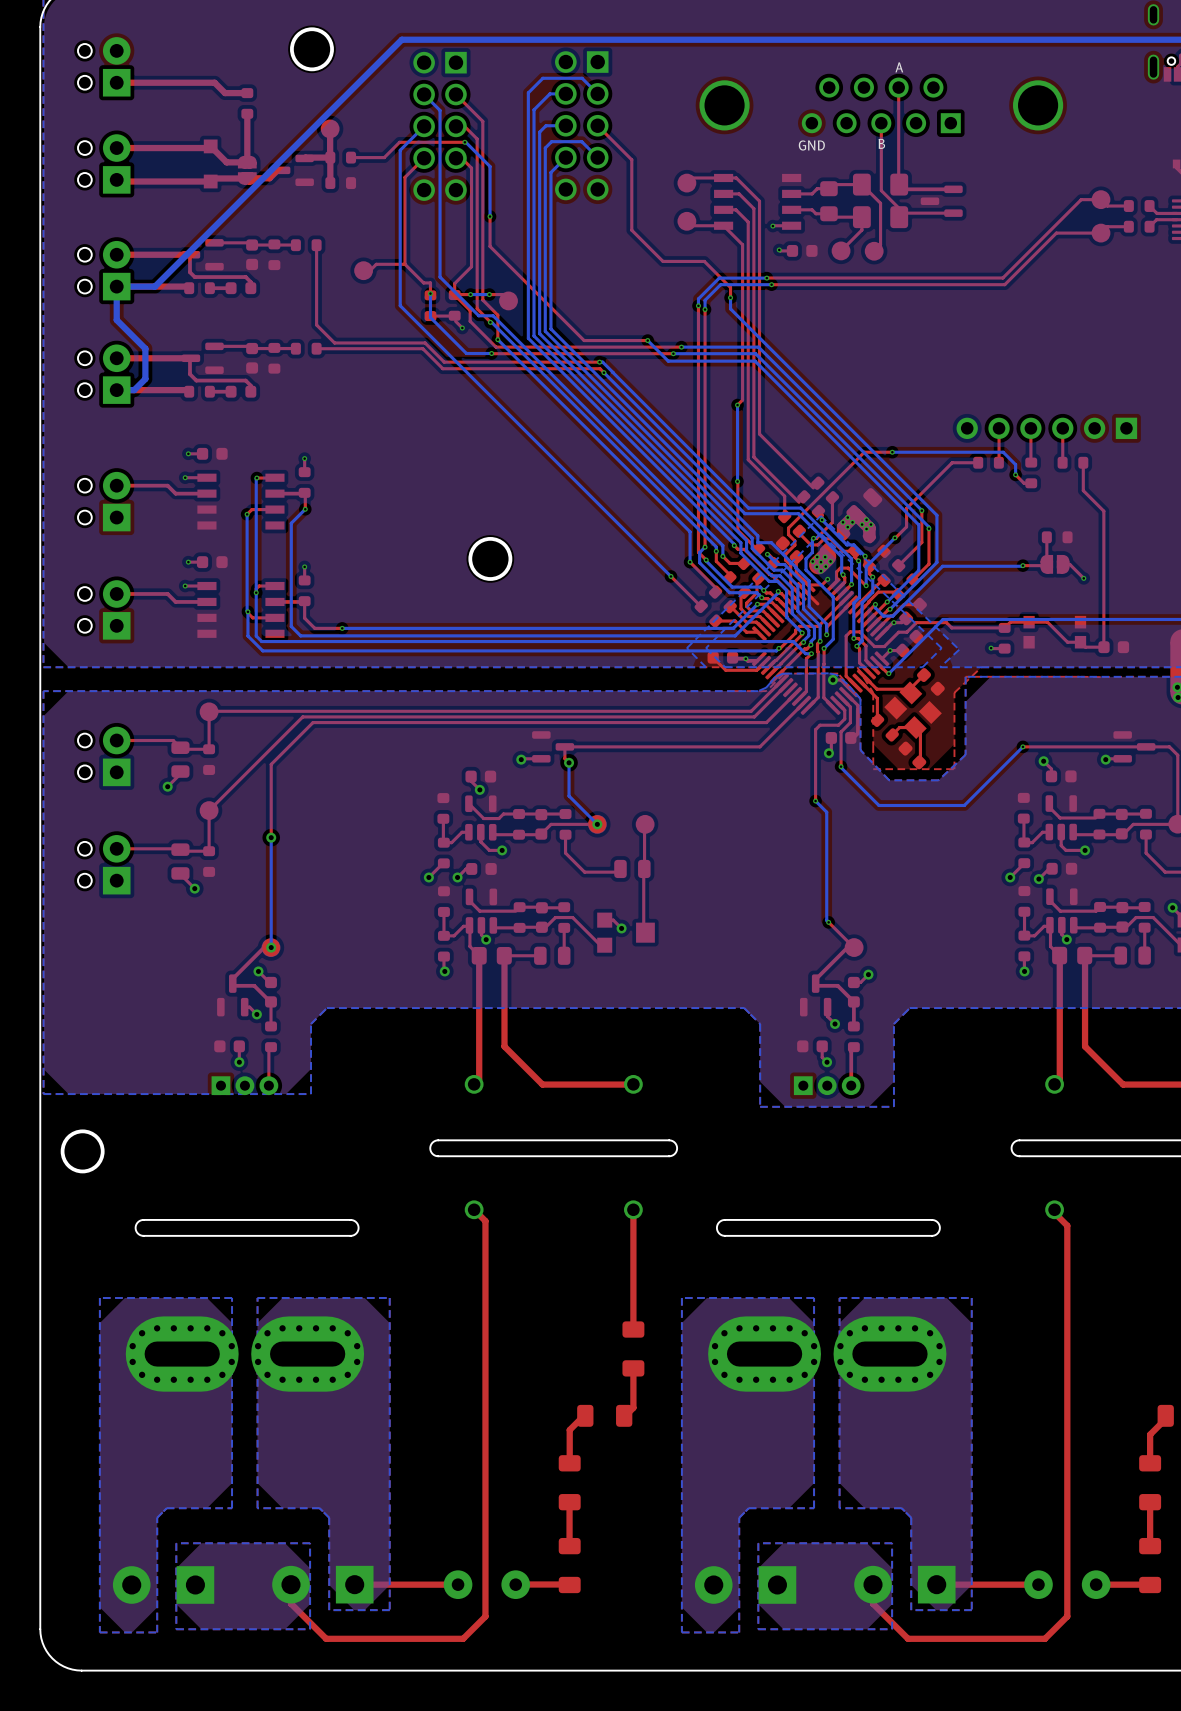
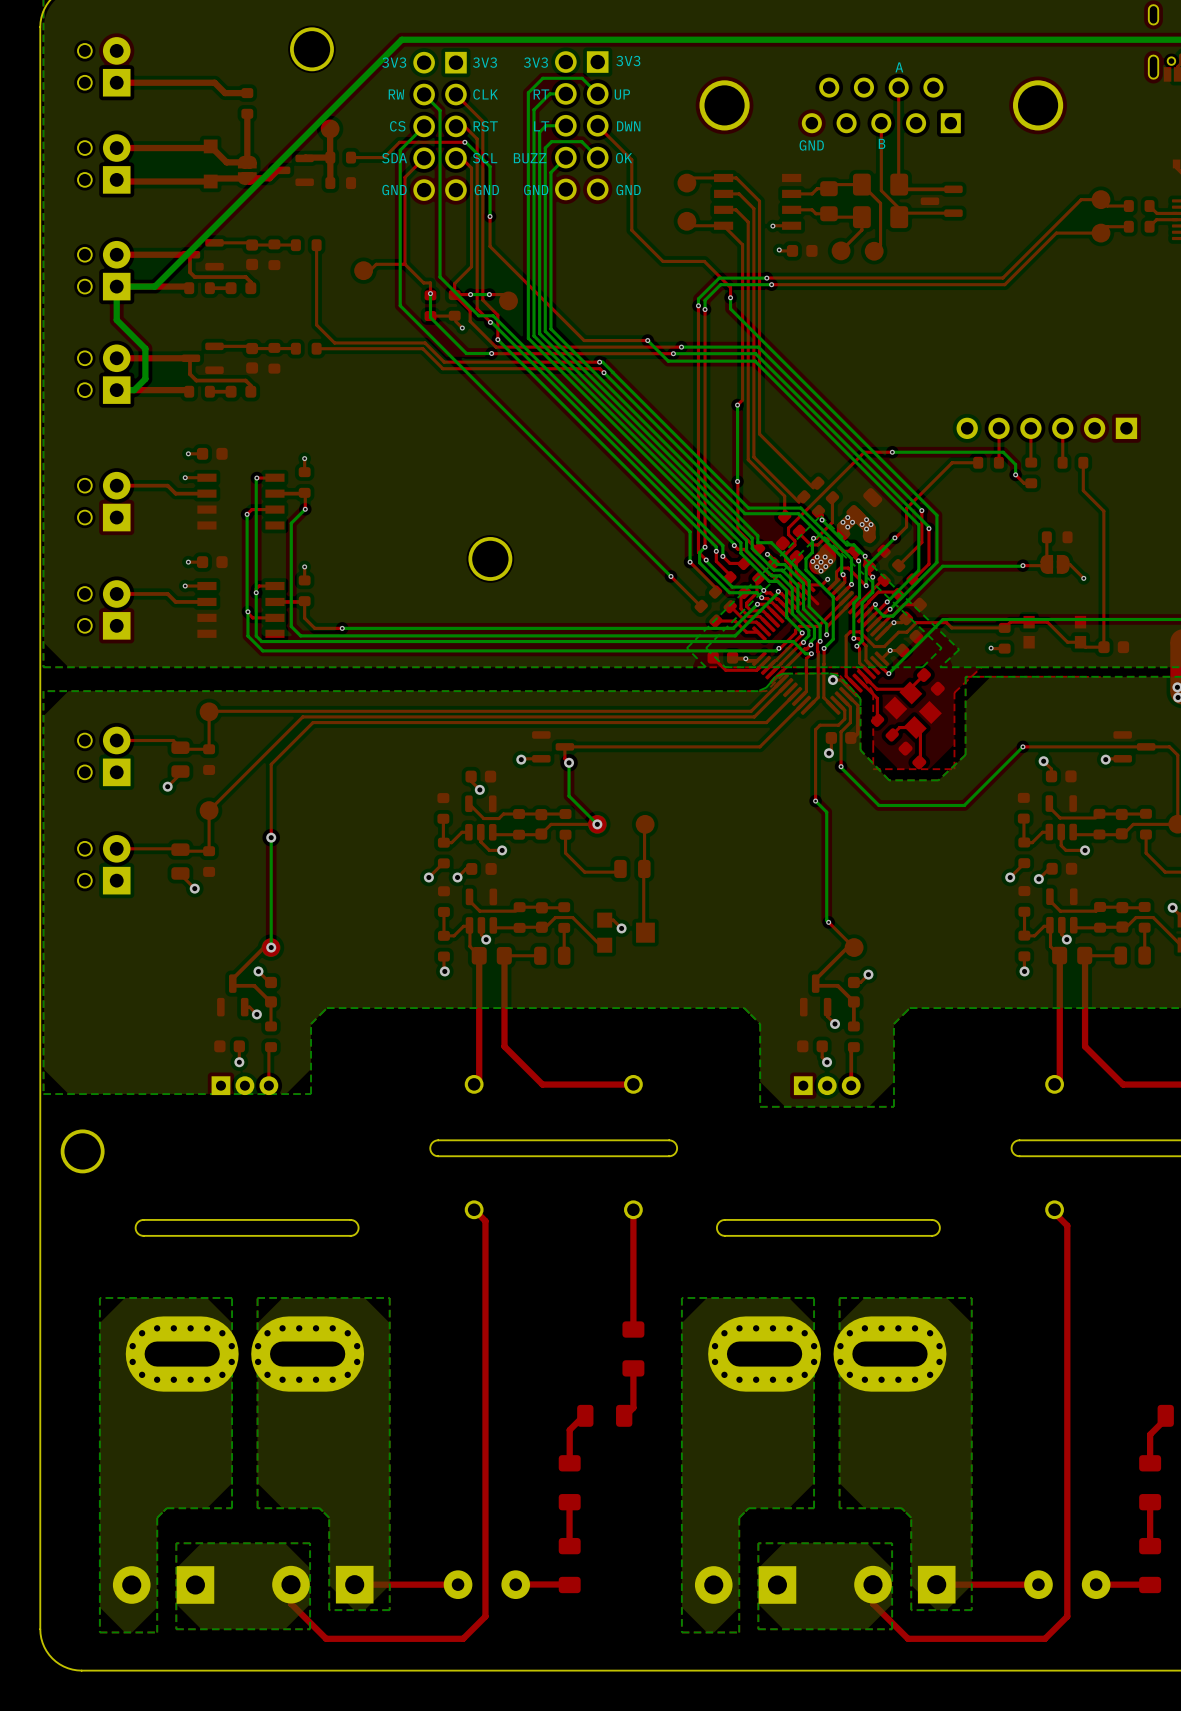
text: none -> 3V3 (628, 61)
text: none -> 3V3 (394, 62)
text: none -> 3V3 (485, 62)
text: none -> 3V3 (535, 62)
text: none -> RW (396, 94)
text: none -> CLK (485, 94)
text: none -> RT (541, 94)
text: none -> UP (622, 94)
text: none -> CS (397, 126)
text: none -> RST (485, 126)
text: none -> LT (541, 126)
text: none -> DWN (628, 126)
text: none -> SDA (394, 158)
text: none -> SCL (485, 158)
text: none -> BUZZ (530, 158)
text: none -> OK (624, 158)
text: none -> GND (394, 190)
text: none -> GND (486, 190)
text: none -> GND (536, 190)
text: none -> GND (628, 190)

